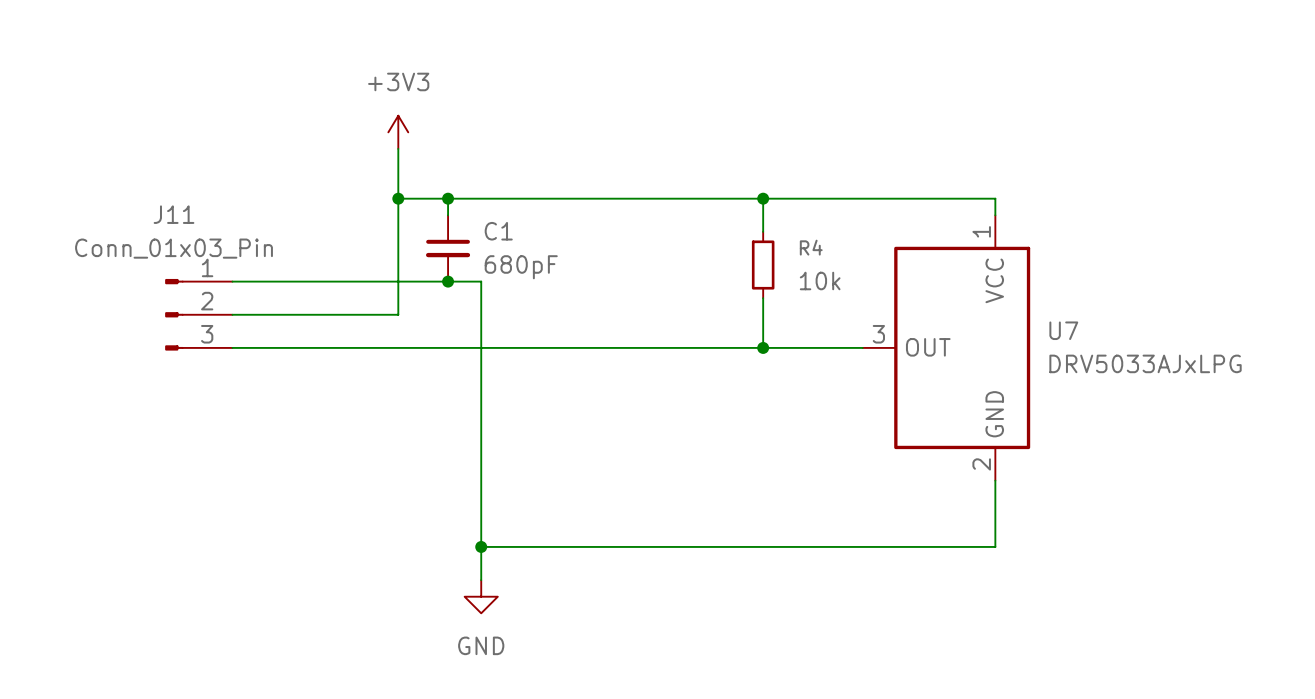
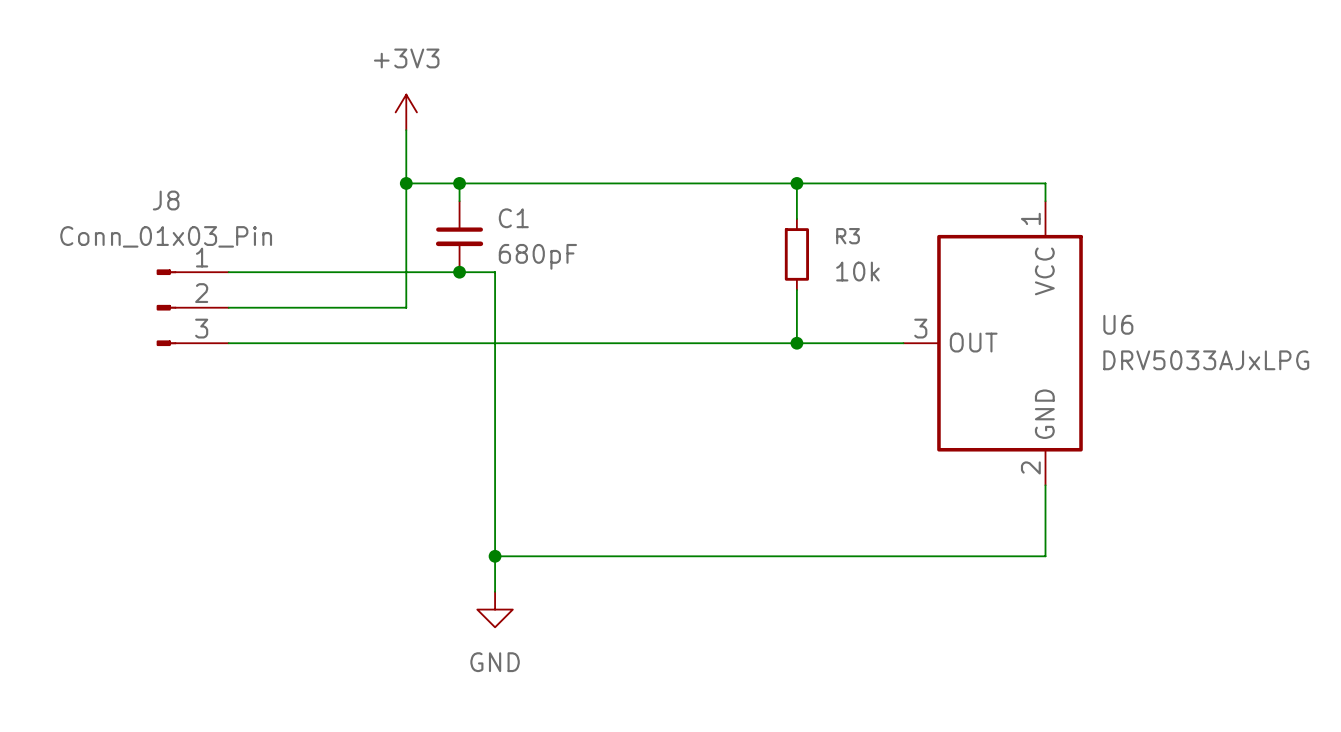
J11 name: J11 (174, 214) -> J8 (166, 200)
R4 name: R4 (811, 247) -> R3 (848, 236)
U7 name: U7 (1063, 330) -> U6 (1118, 324)

